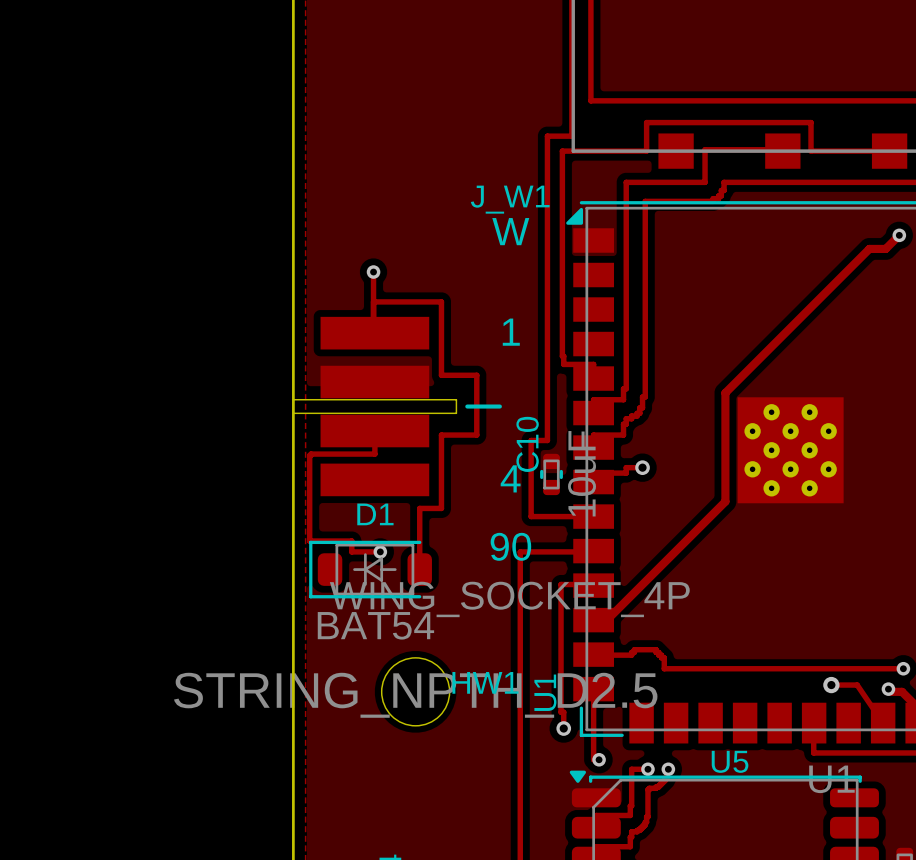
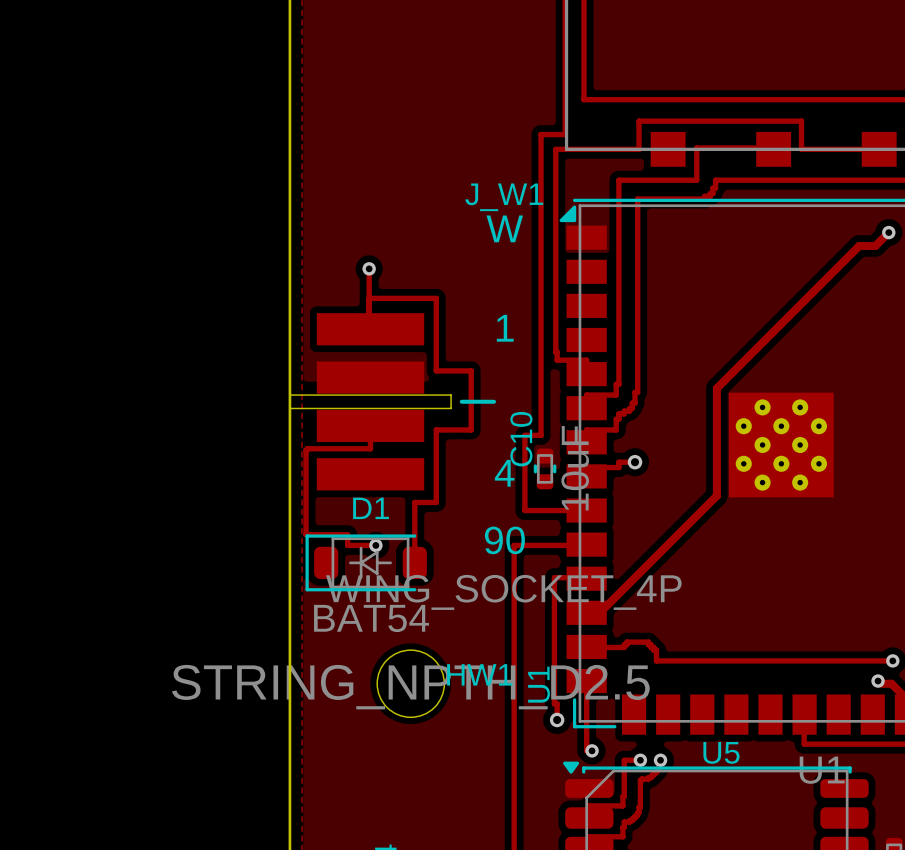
track: (831, 685) (857, 685) (883, 723) -> none
via: (831, 685) -> none

